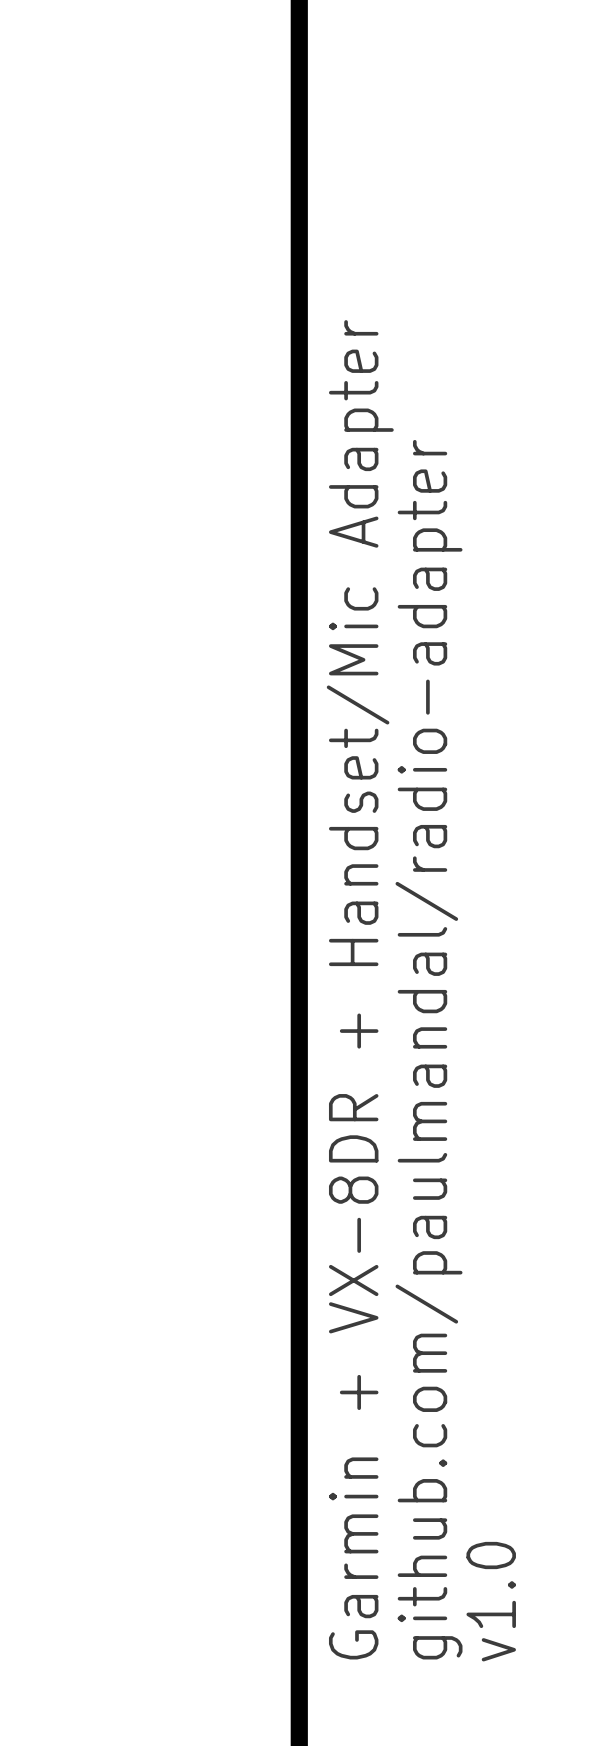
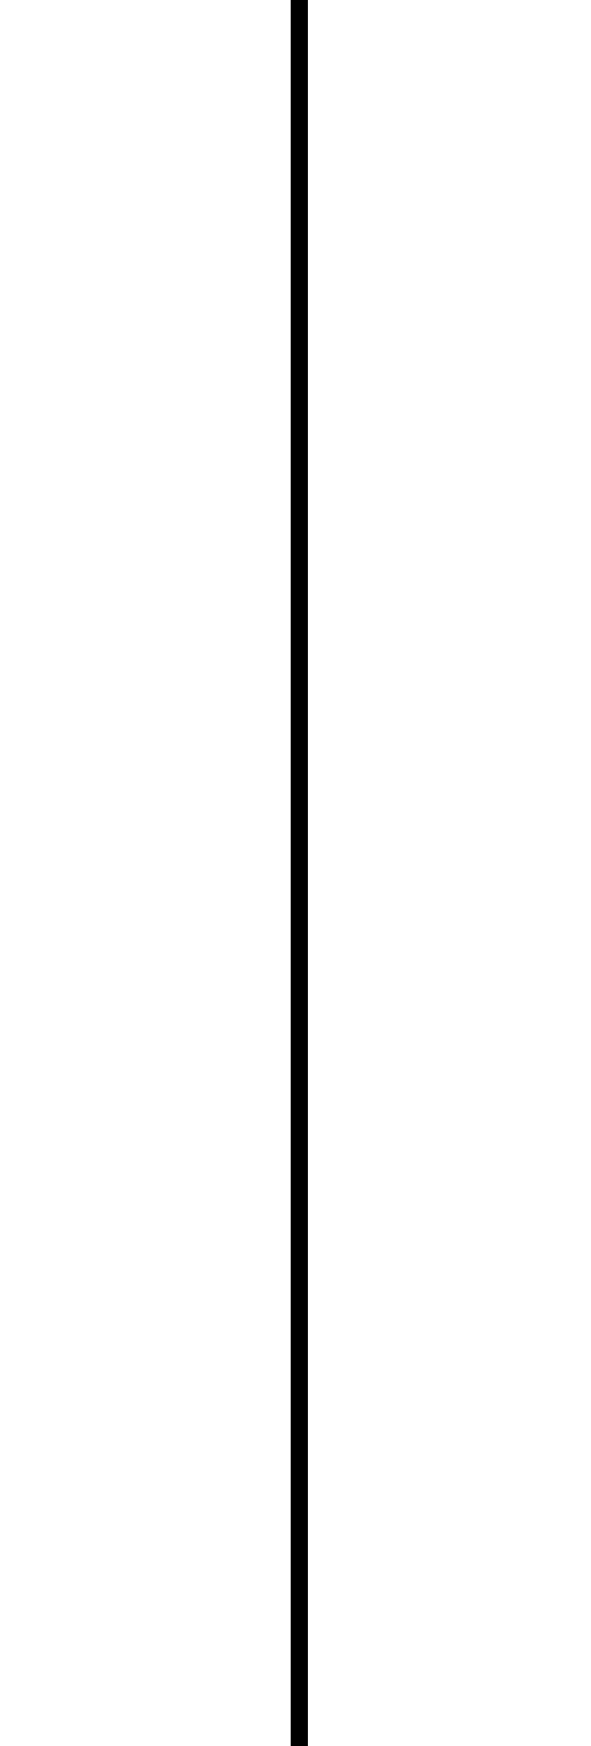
text: Garmin + VX-8DR + Handset/Mic Adapter (360, 989) -> none
text: github.com/paulmandal/radio-adapter (429, 1049) -> none
text: v1.0 (491, 1601) -> none

